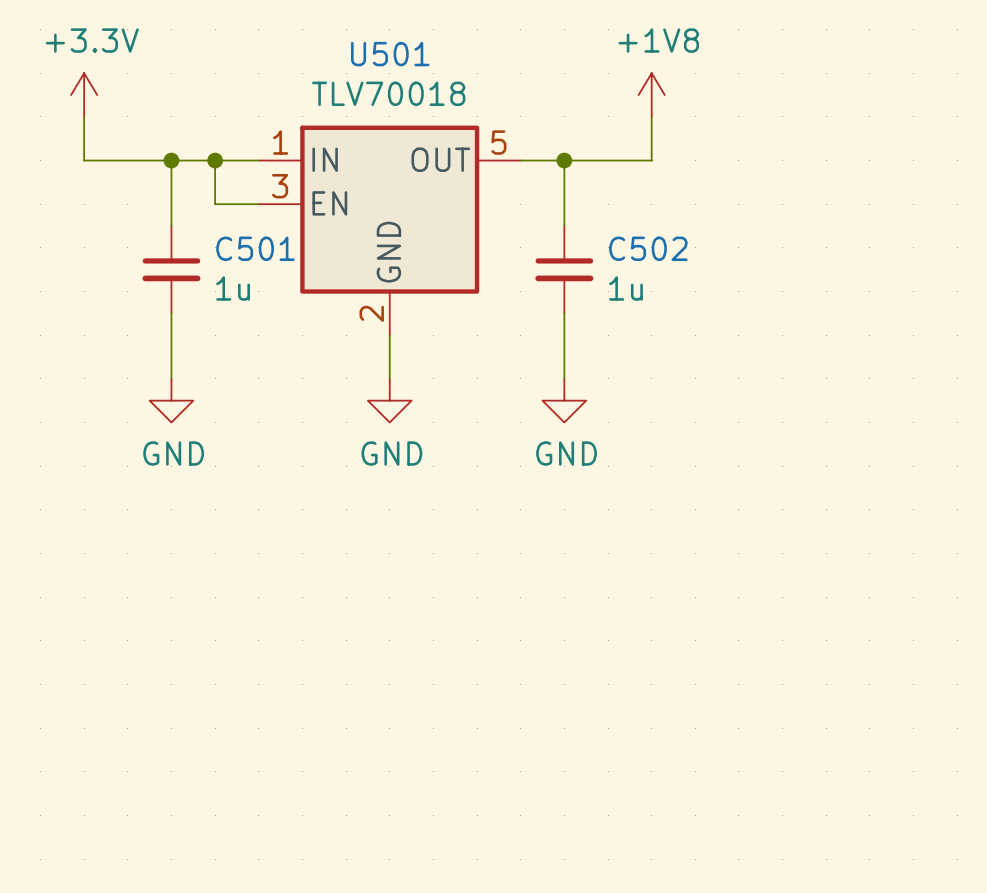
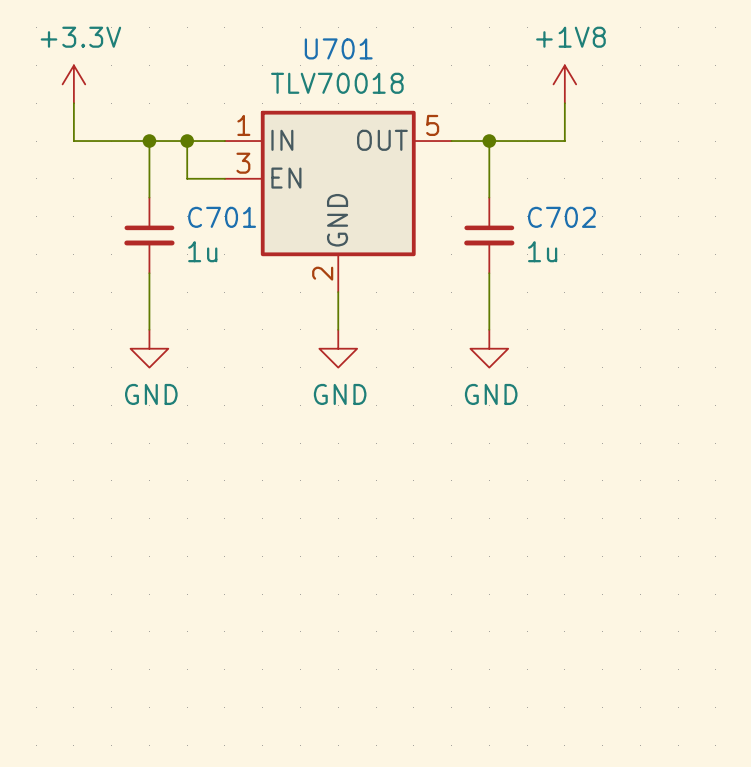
U501 name: U501 (390, 54) -> U701 (338, 48)
C501 name: C501 (255, 248) -> C701 (222, 217)
C502 name: C502 (648, 248) -> C702 (561, 217)

